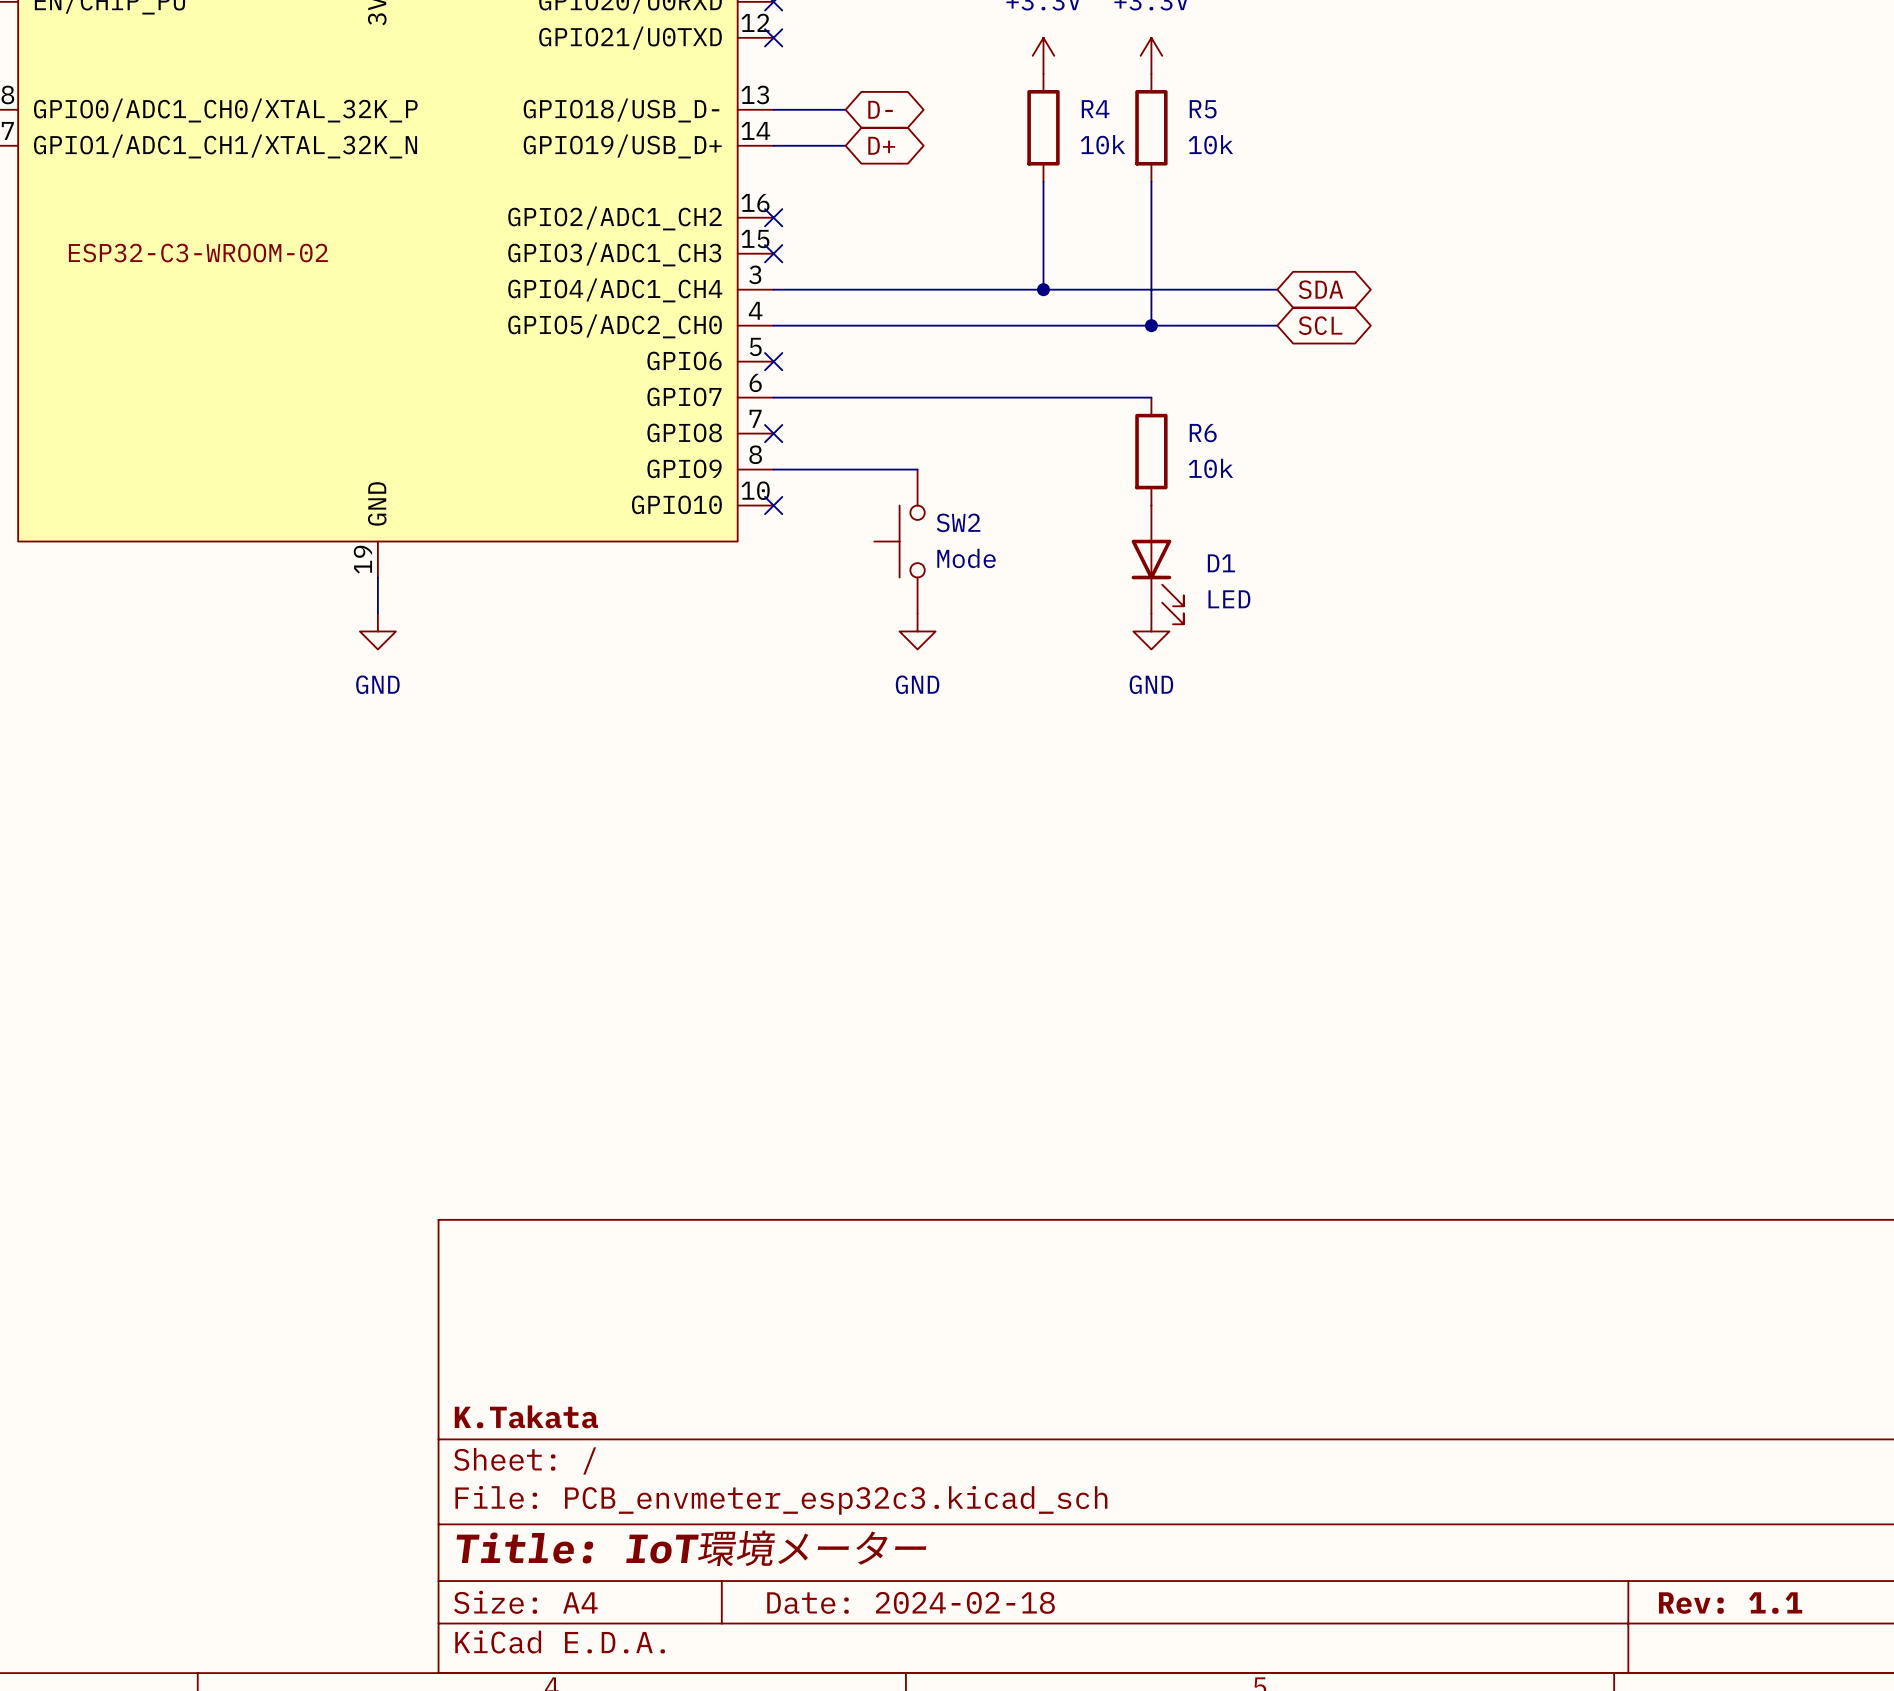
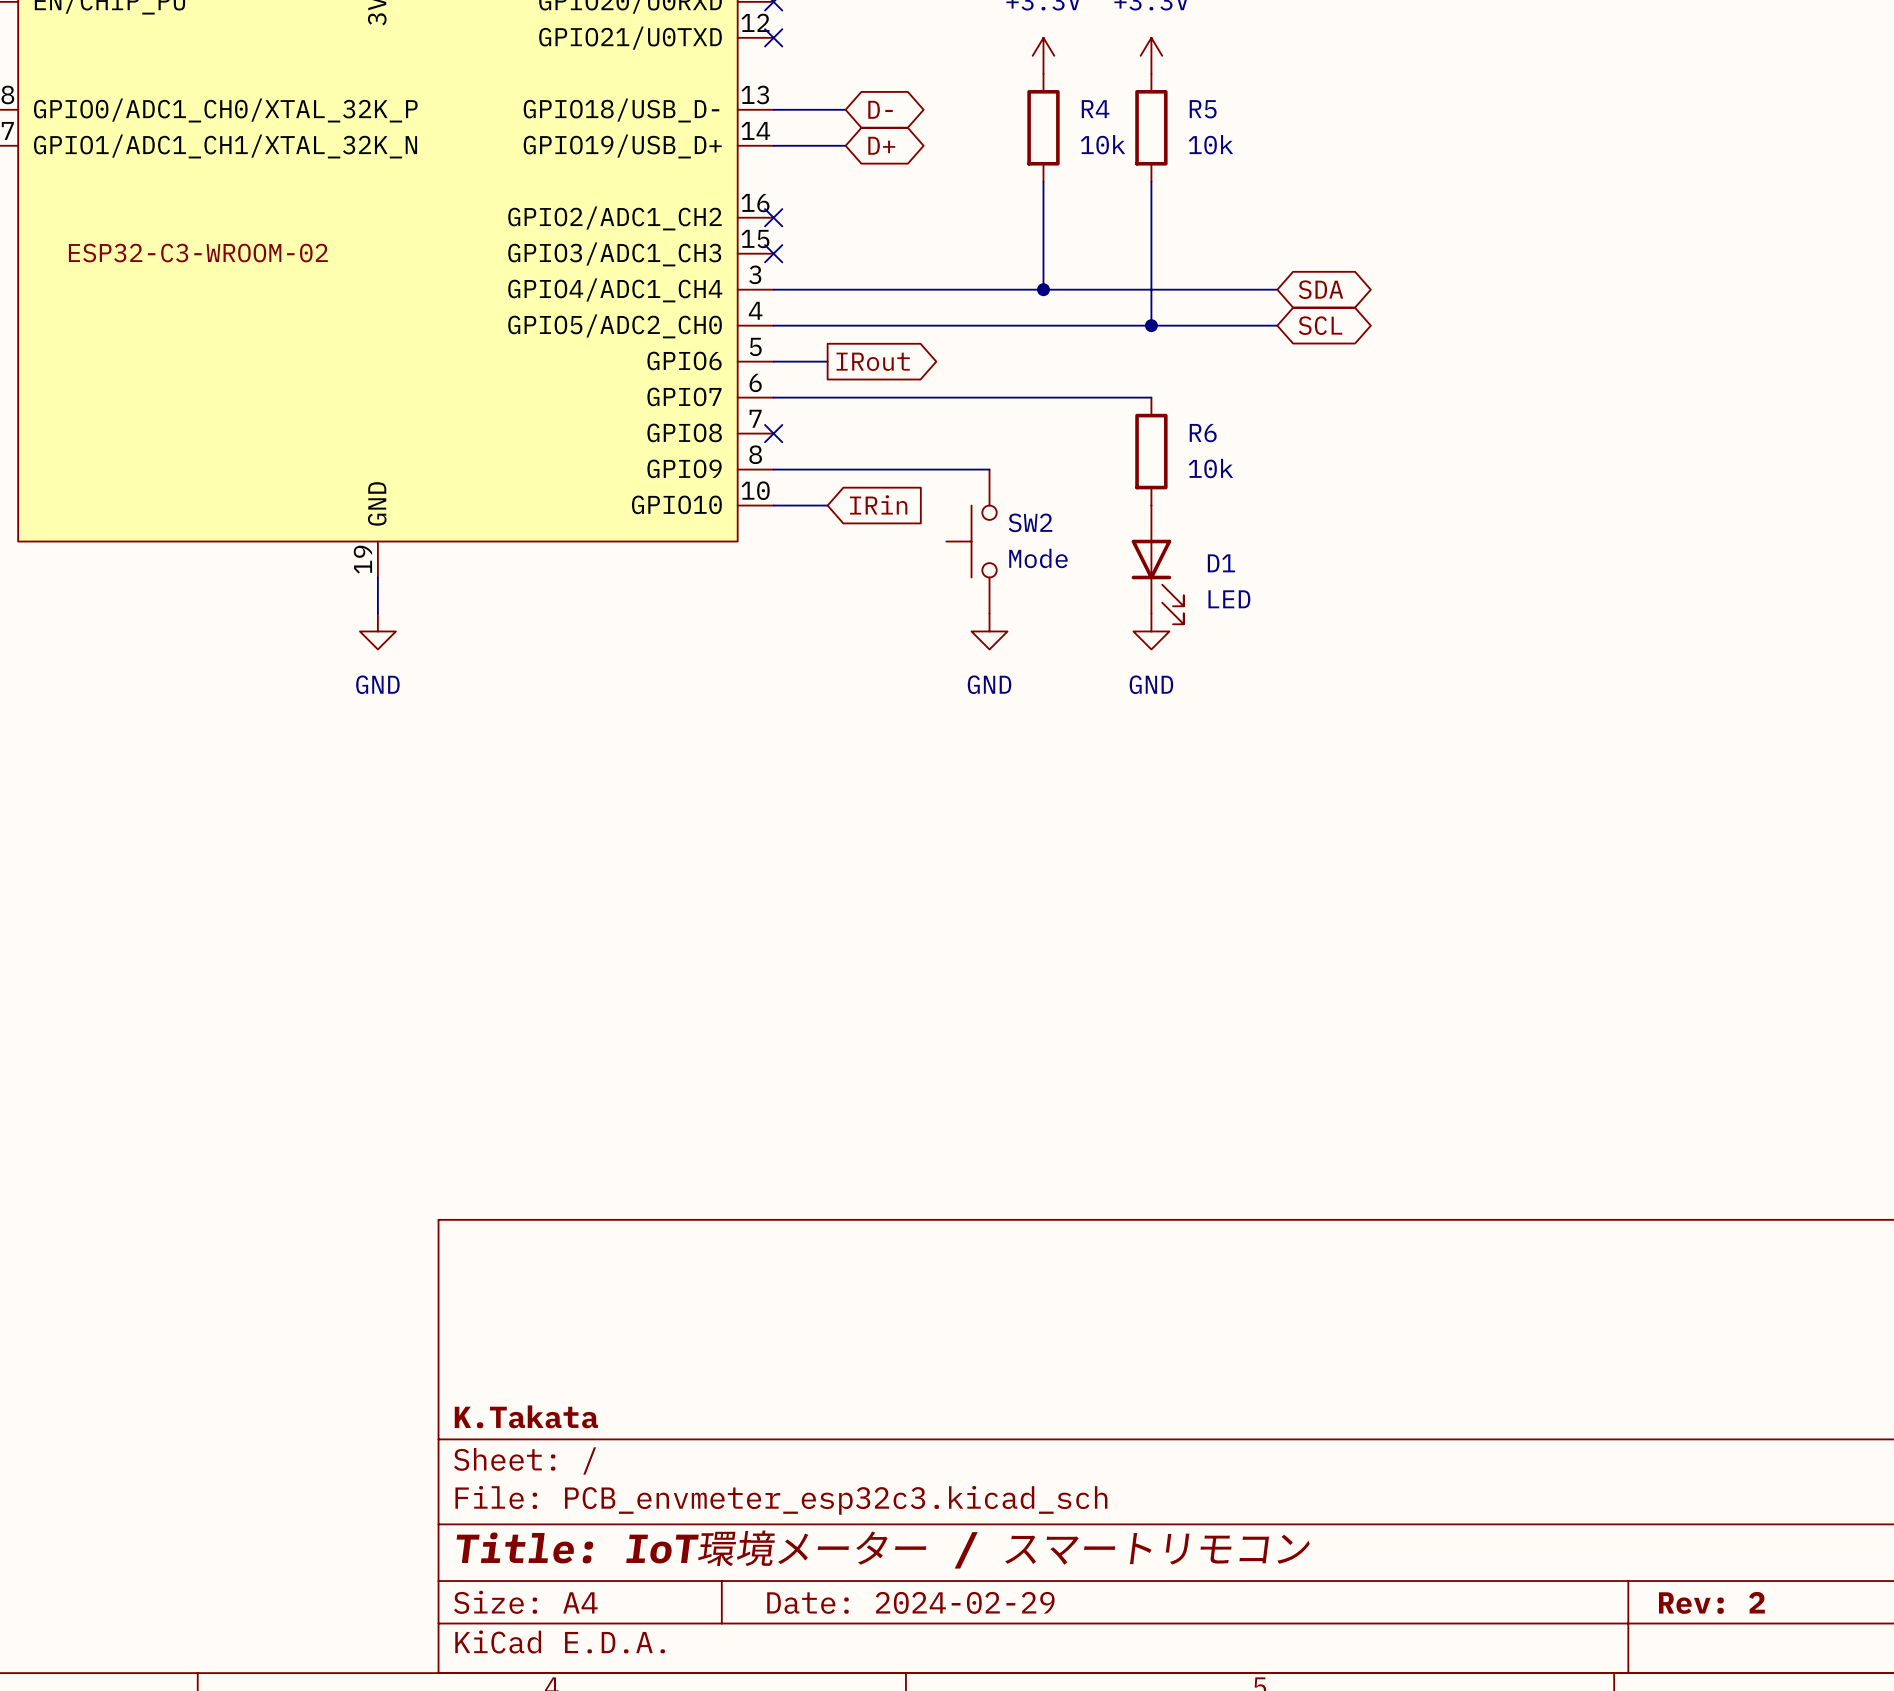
wire: none -> (773, 361) (827, 361)
no-connect mark: (773, 361) -> none
global label: none -> IRout (873, 361)
wire: none -> (917, 469) (989, 469)
global label: none -> IRin (878, 504)
wire: none -> (773, 505) (827, 505)
no-connect mark: (773, 505) -> none
SW2 position: (899, 541) -> (971, 541)
power symbol position: GND (917, 631) -> GND (989, 631)
title block: Title: IoT環境メーター (691, 1548) -> Title: IoT環境メーター / スマートリモコン (883, 1549)
title block: Date: 2024-02-18 (911, 1602) -> Date: 2024-02-29 (910, 1602)
title block: Rev: 1.1 (1730, 1603) -> Rev: 2 (1711, 1602)

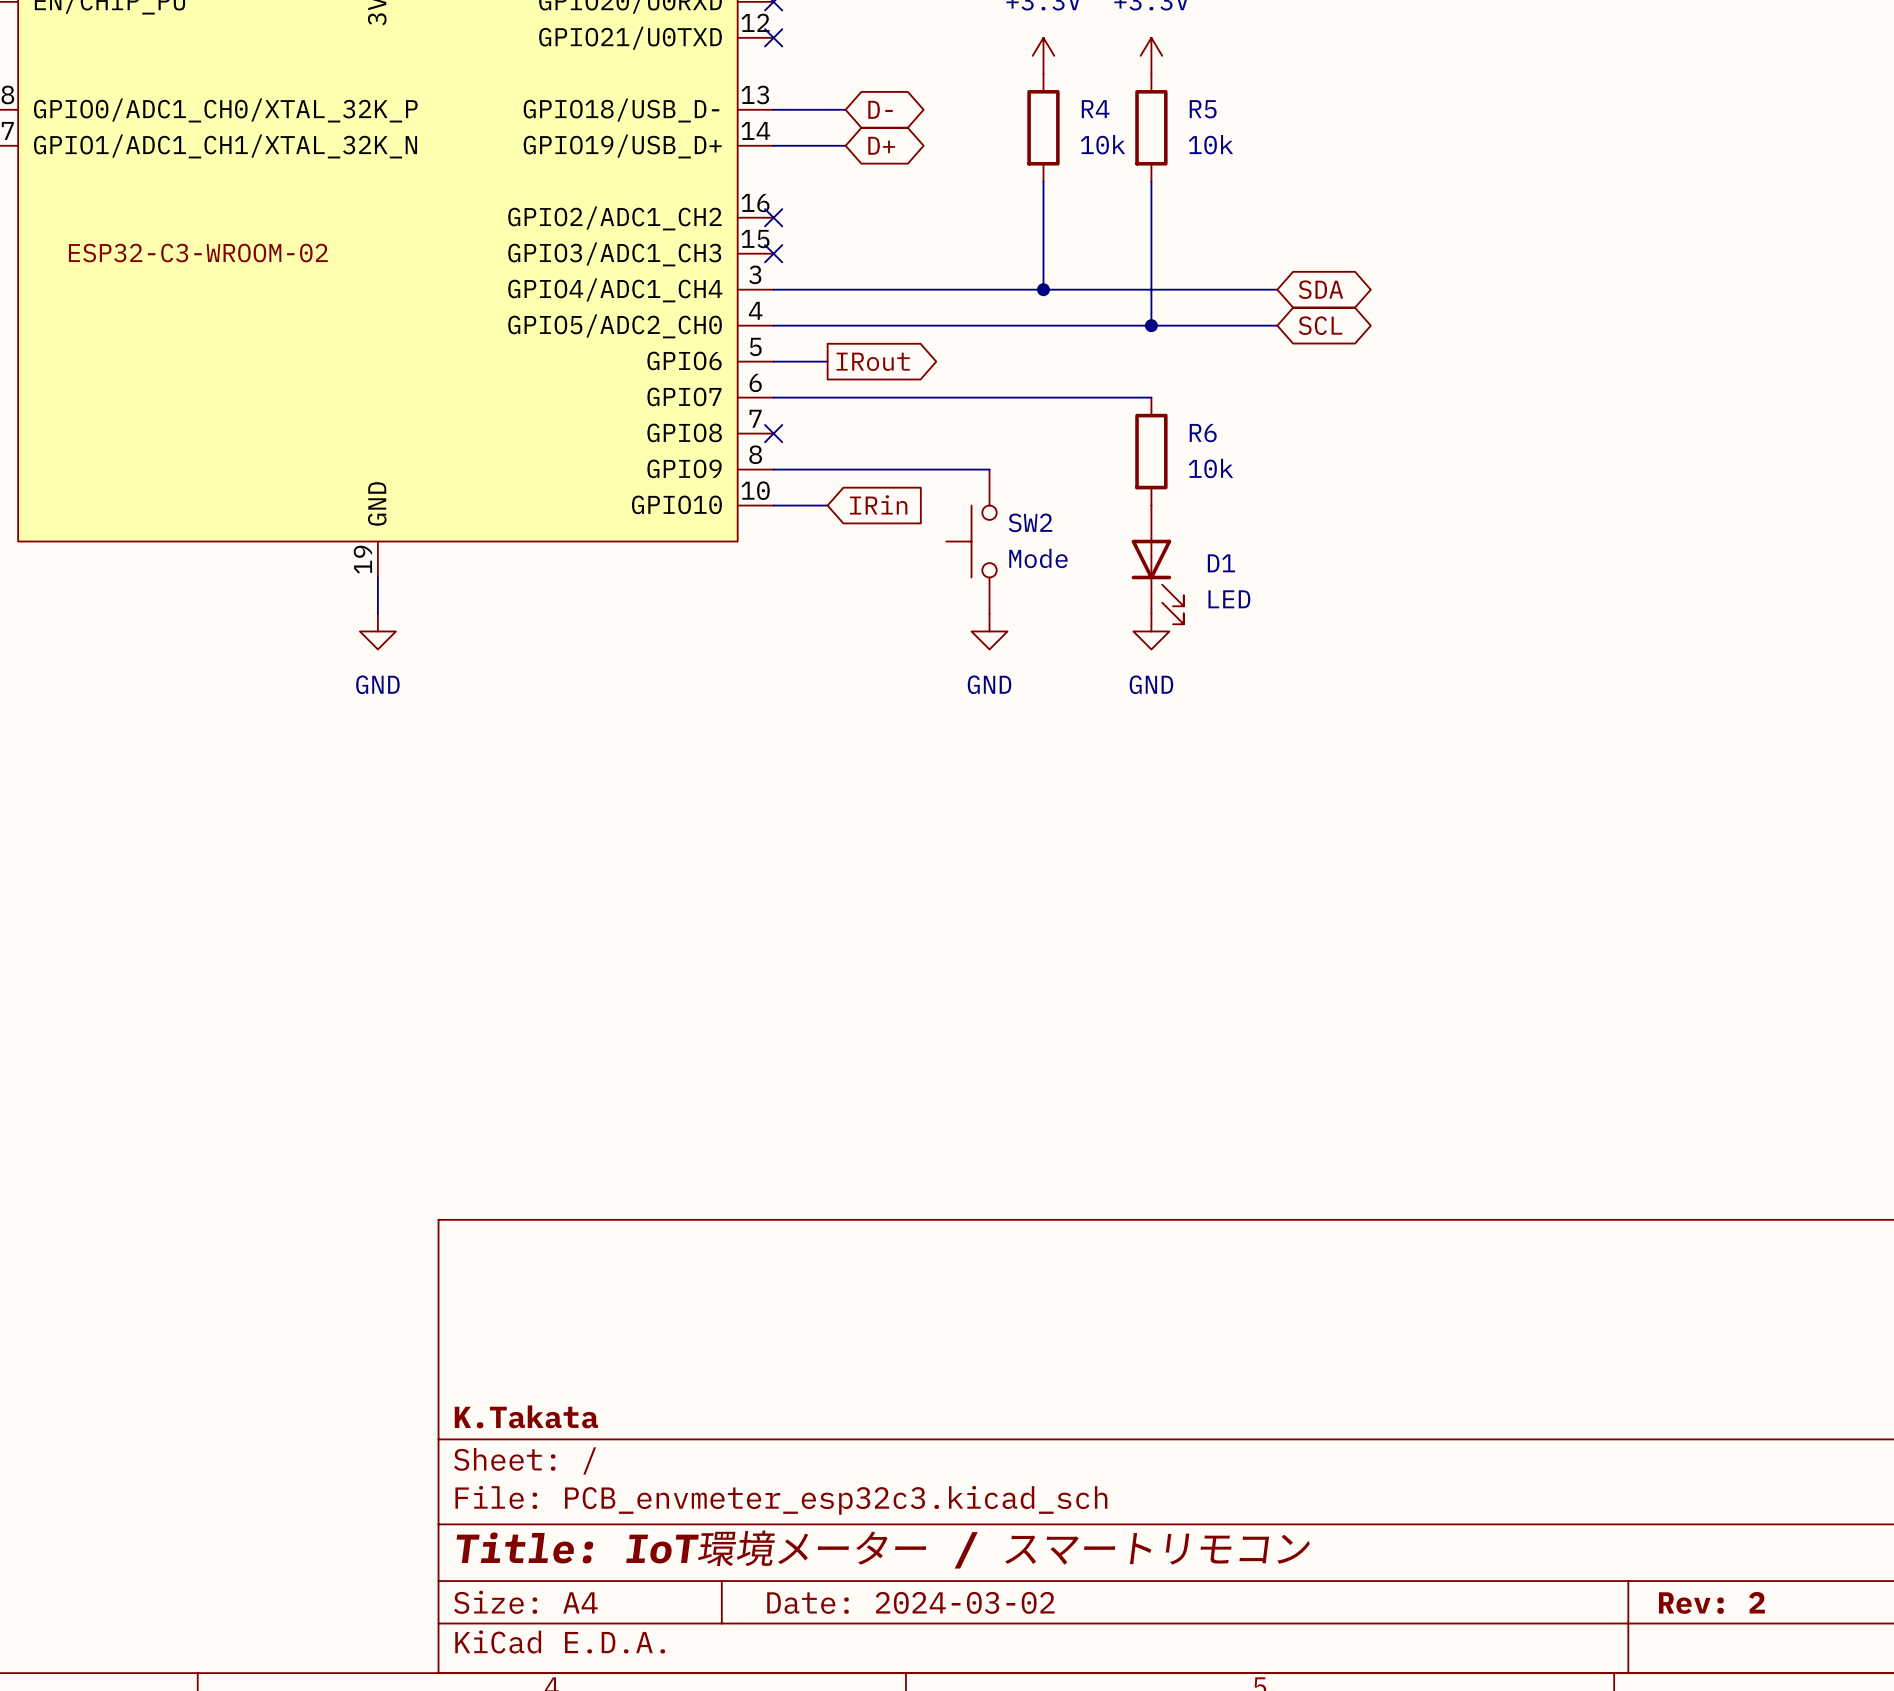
title block: Date: 2024-02-29 (910, 1602) -> Date: 2024-03-02 (910, 1602)

